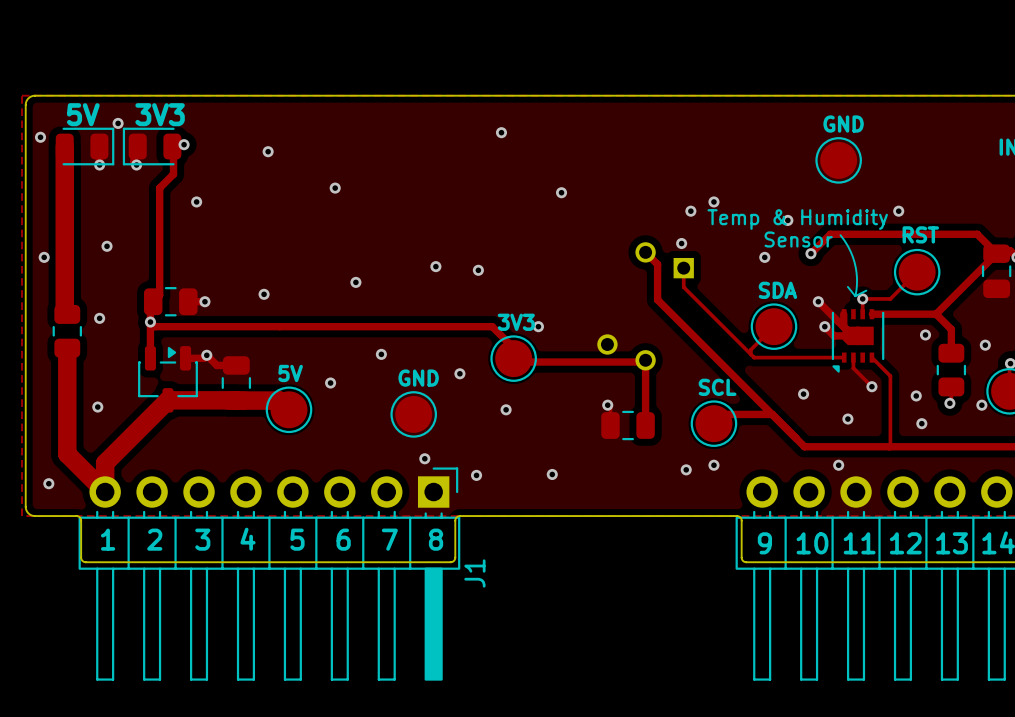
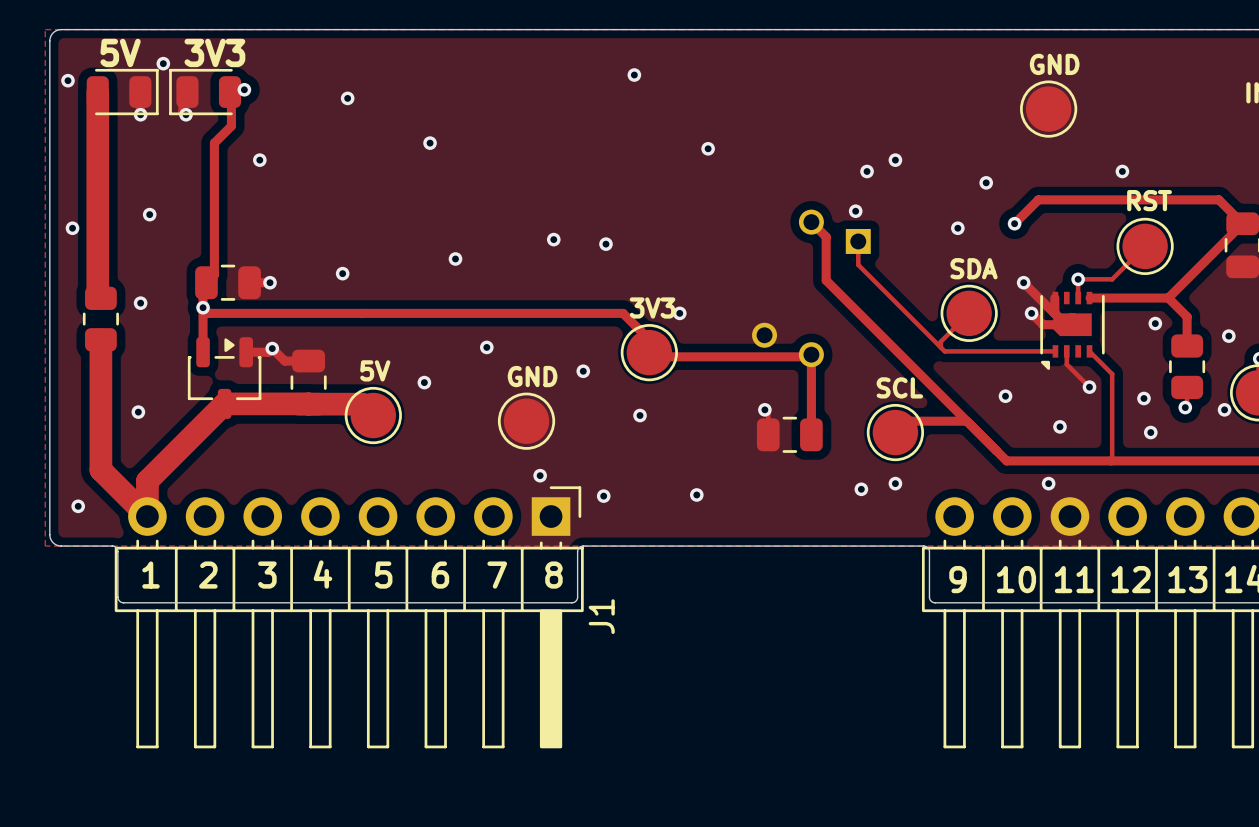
text: Temp & Humidity (797, 219) -> none
line: (840, 235) (848, 246) (854, 262) (857, 280) (855, 296) -> none
text: Sensor (798, 239) -> none
line: (847, 286) (855, 296) -> none
line: (866, 290) (855, 296) -> none

